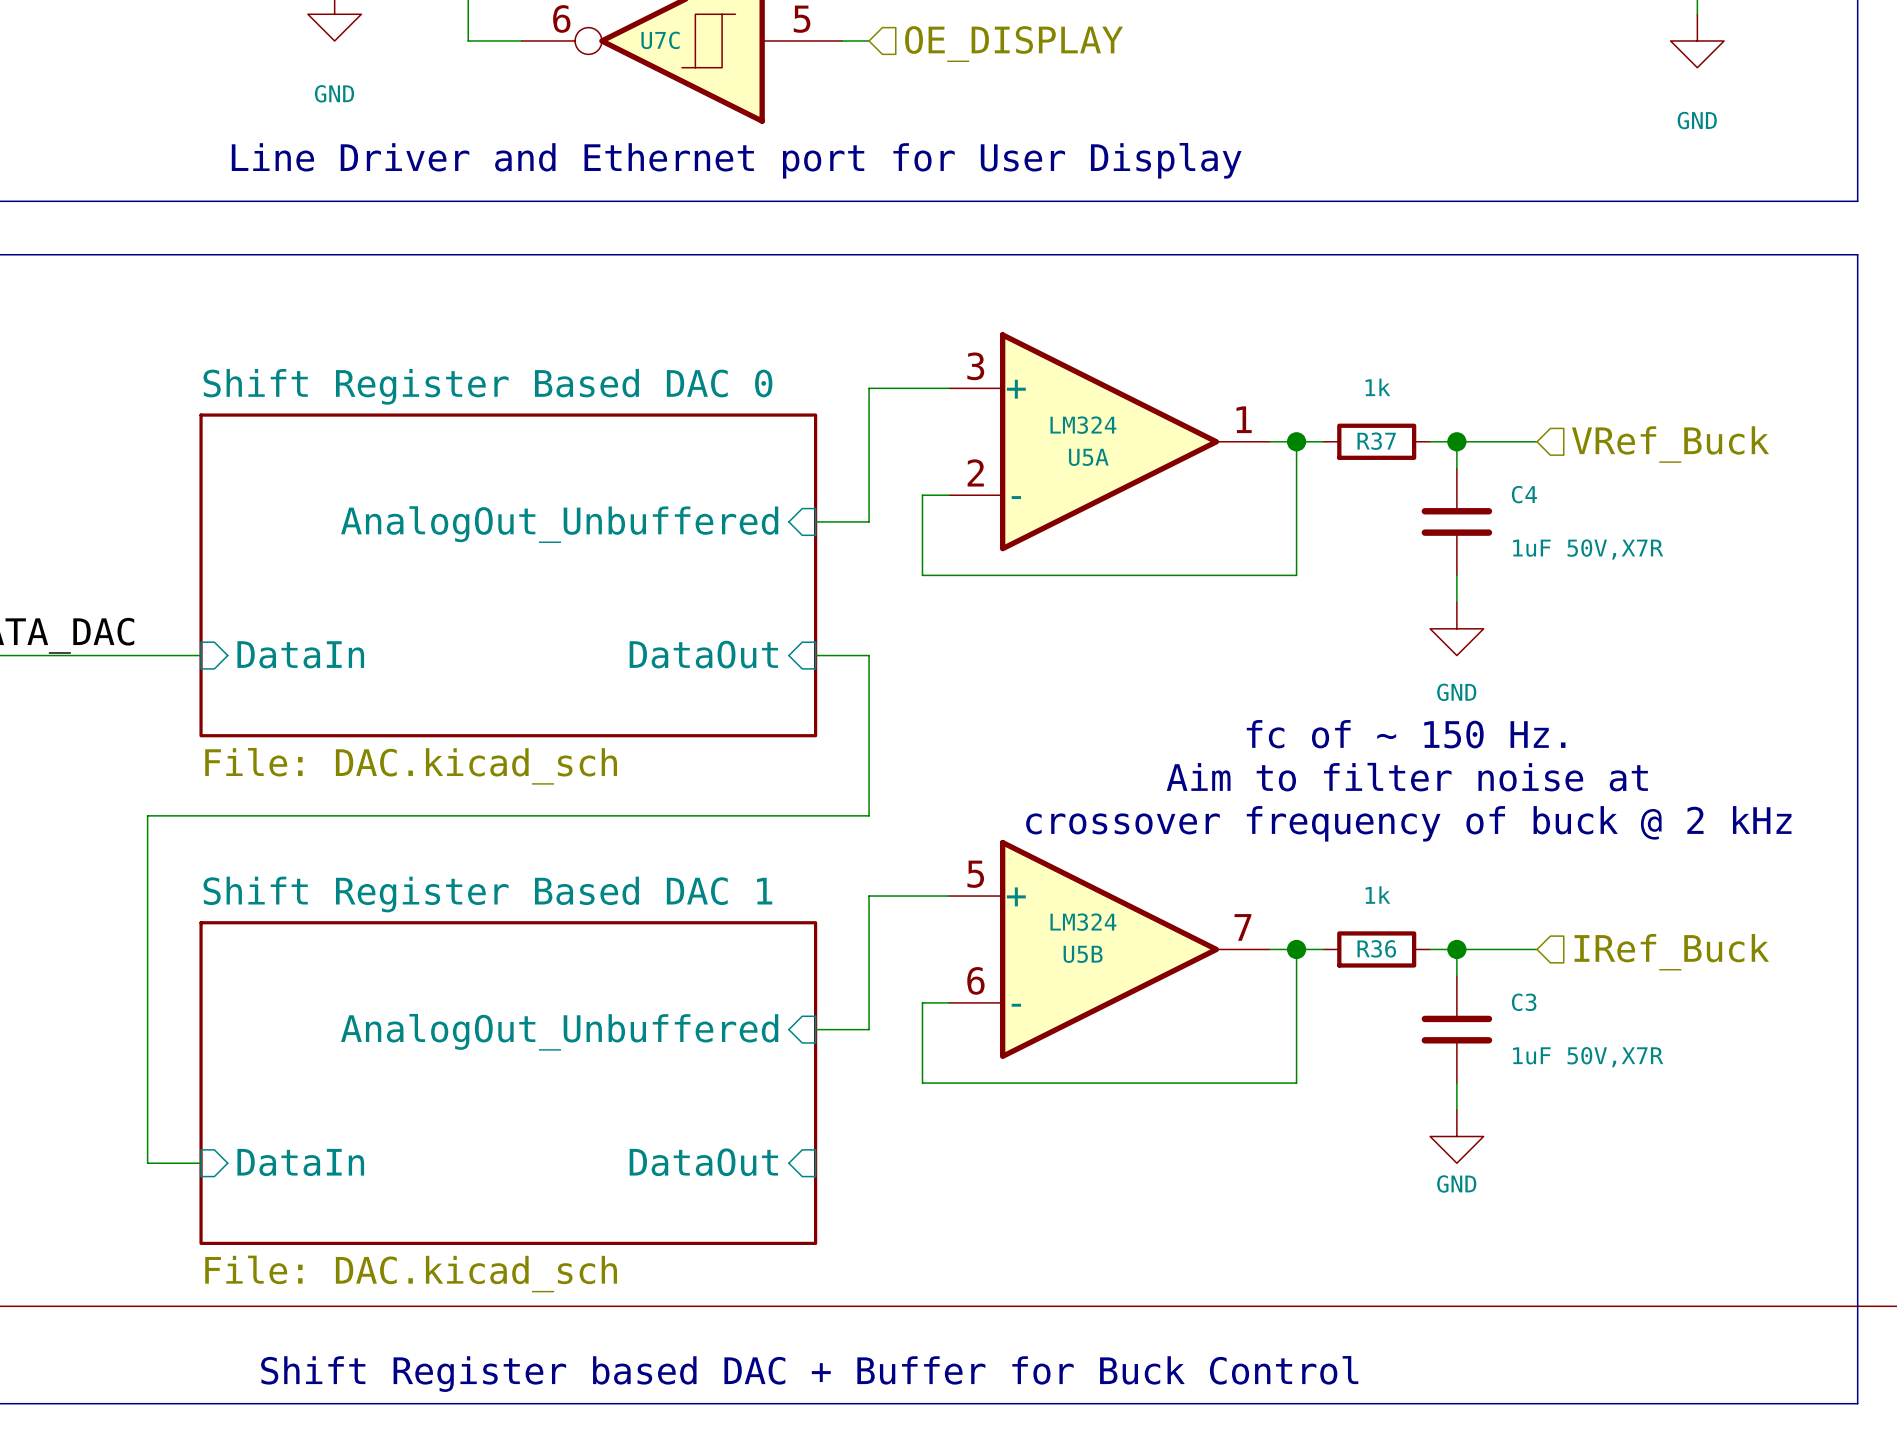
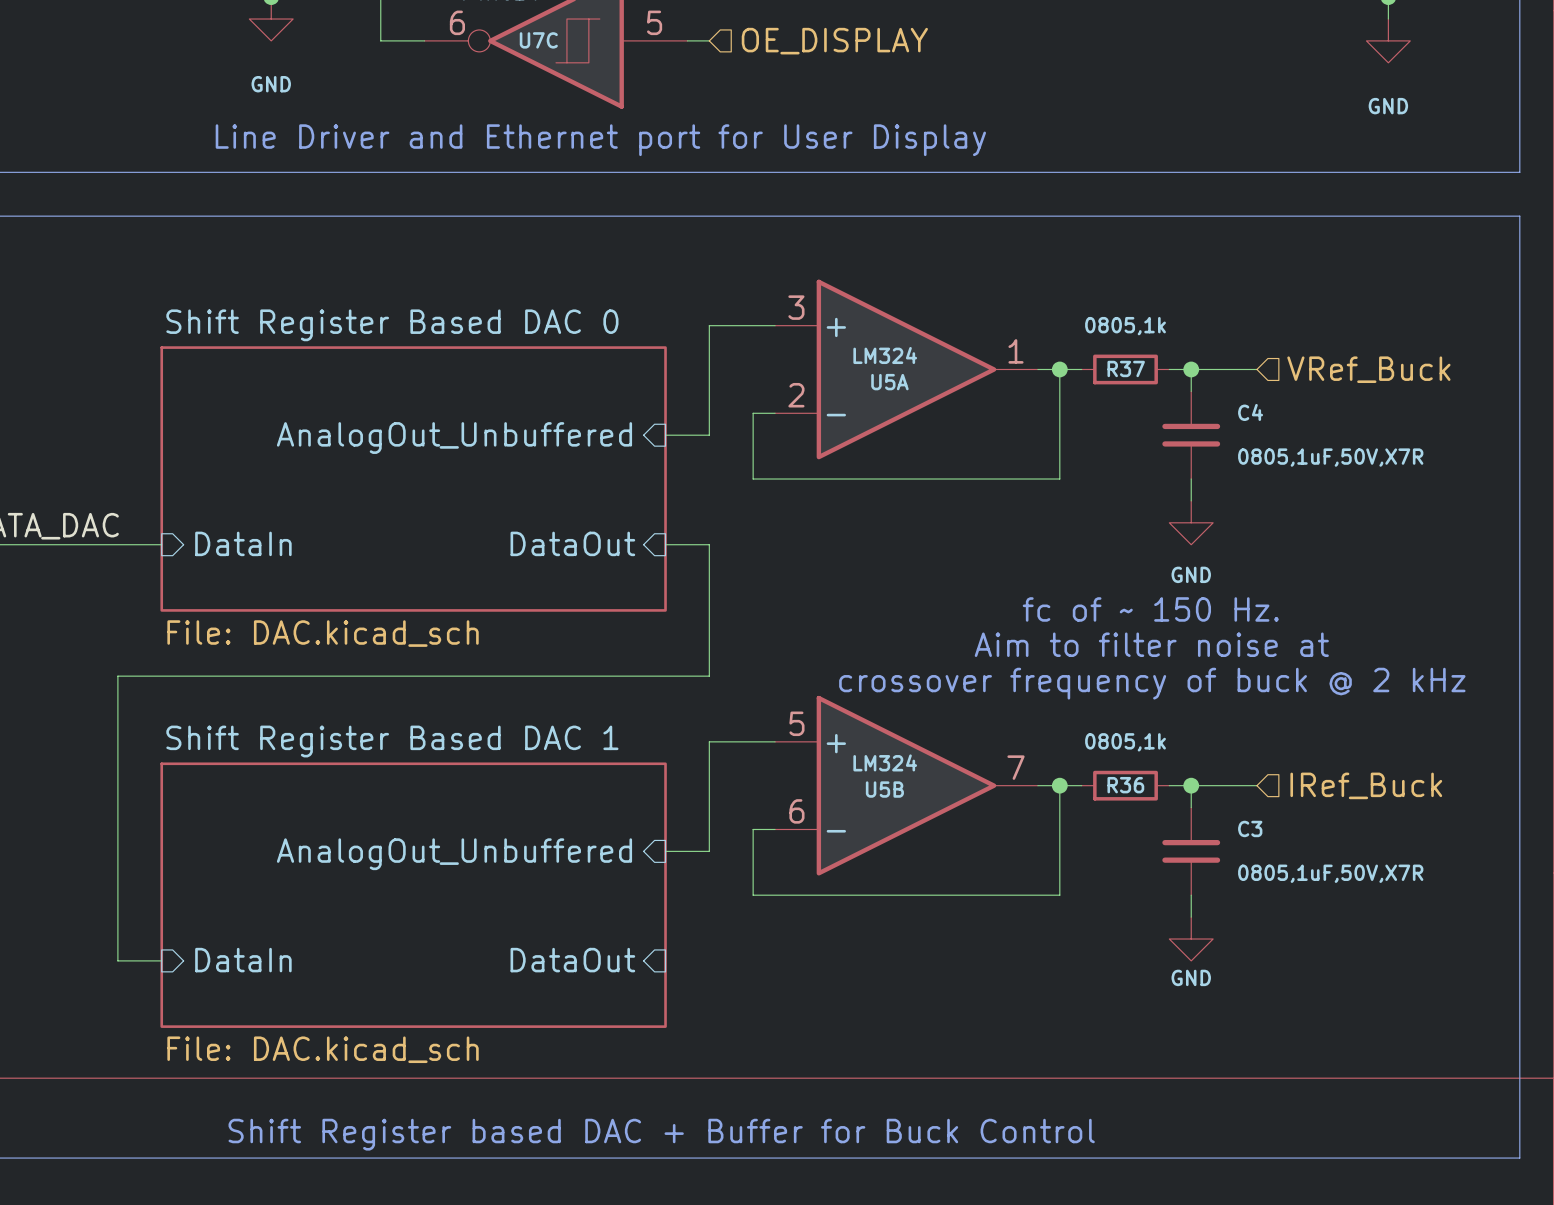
R37 value: 1k (1377, 387) -> 0805,1k (1125, 326)
C4 value: 1uF 50V,X7R (1588, 549) -> 0805,1uF,50V,X7R (1330, 457)
R36 value: 1k (1377, 895) -> 0805,1k (1125, 742)
C3 value: 1uF 50V,X7R (1588, 1057) -> 0805,1uF,50V,X7R (1330, 873)

